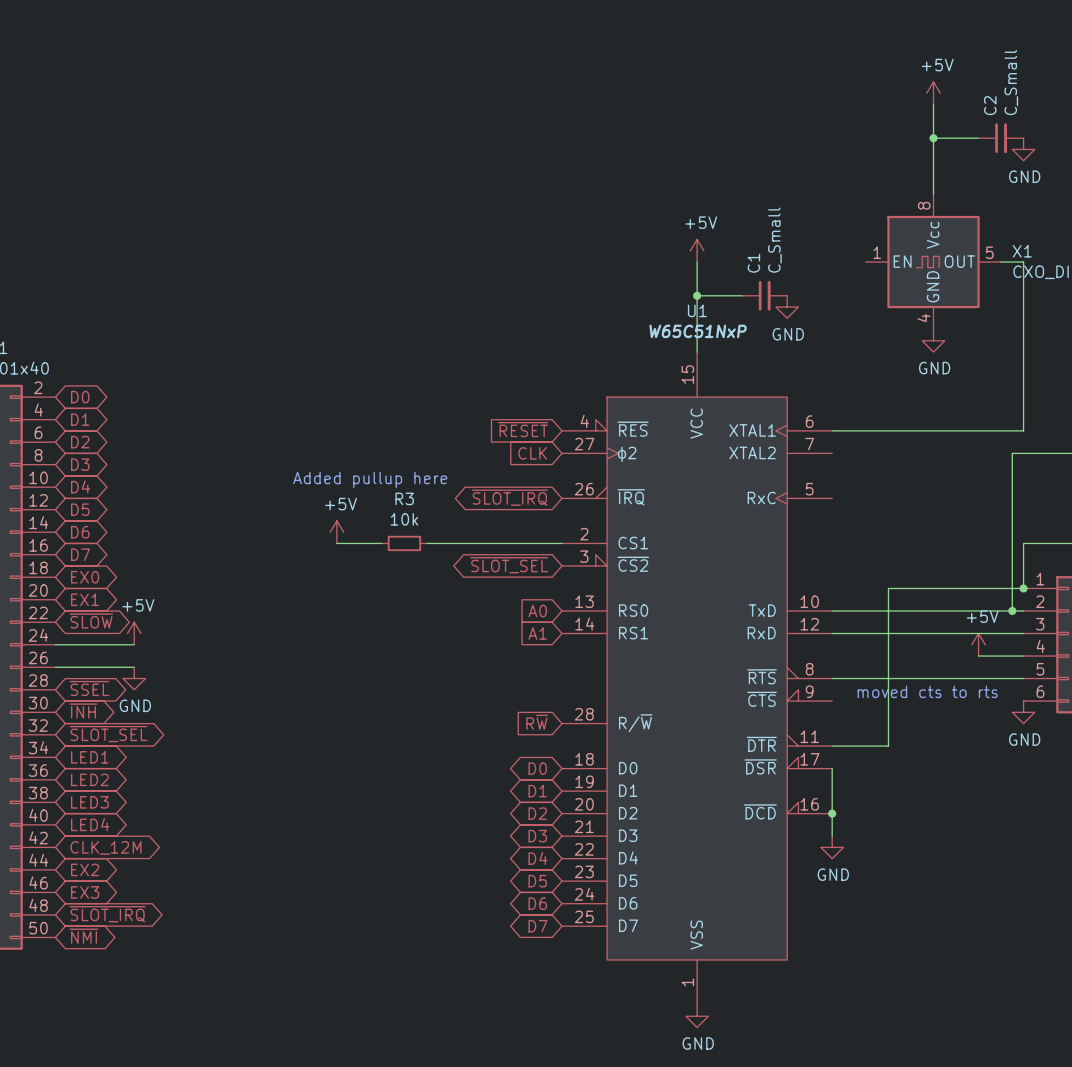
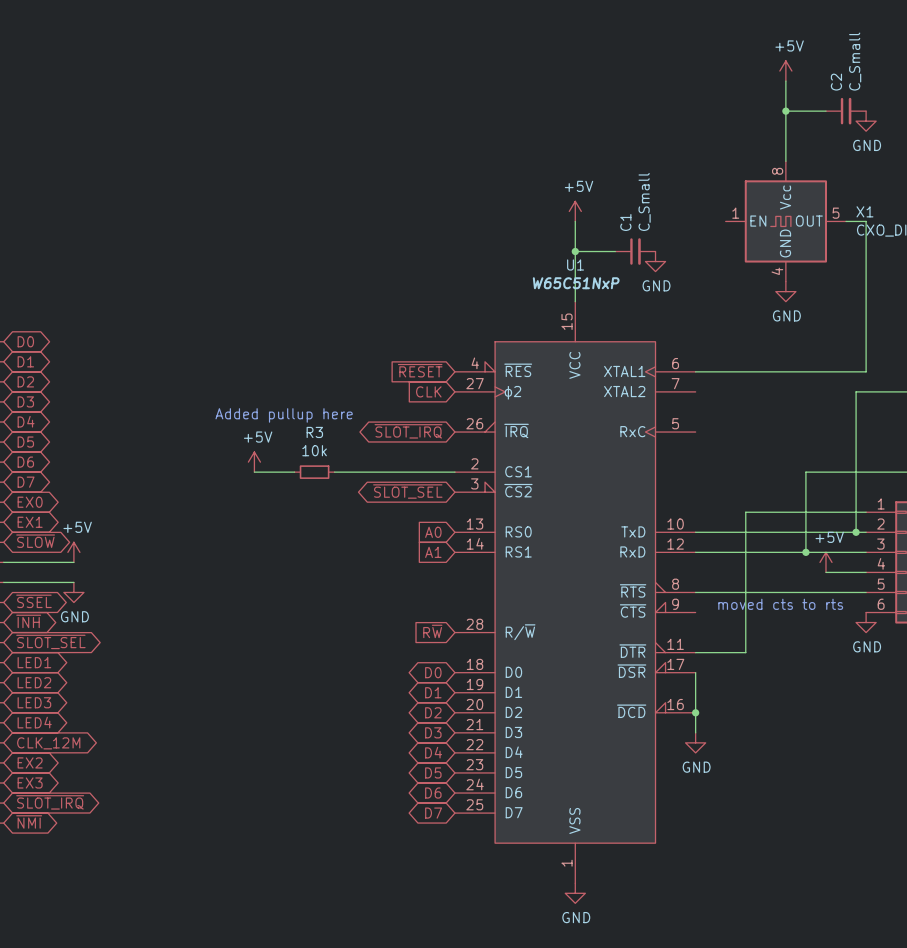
wire: (1023, 543) (1023, 588) -> (866, 472) (805, 472) (805, 552)
junction: (1023, 588) -> none
junction: none -> (805, 552)

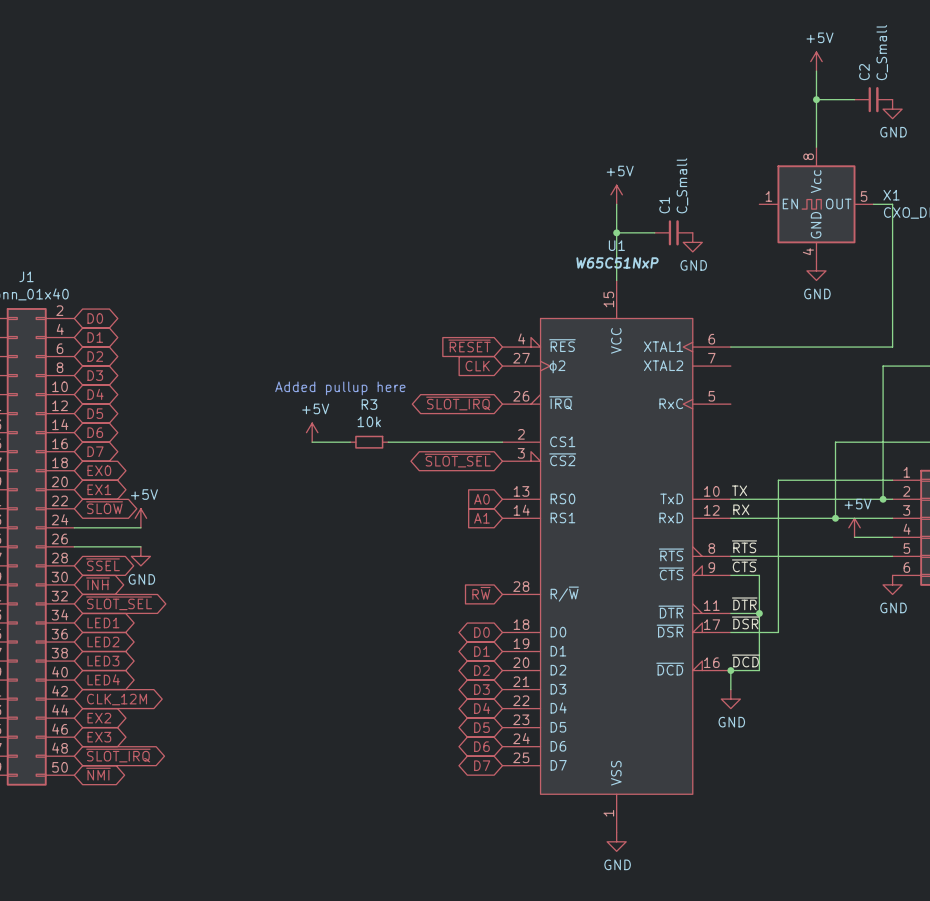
label: none -> TX (739, 490)
label: none -> RX (741, 509)
label: none -> ~{RTS} (744, 546)
label: none -> ~{CTS} (744, 565)
text: moved cts to rts (780, 604) -> none
label: none -> ~{DTR} (744, 603)
wire: (725, 652) (745, 652) -> (730, 632) (778, 632) (778, 613)
junction: none -> (759, 613)
label: none -> ~{DSR} (745, 622)
wire: (695, 672) (695, 712) -> (730, 575) (759, 575) (759, 670) (730, 670)
label: none -> ~{DCD} (745, 660)

